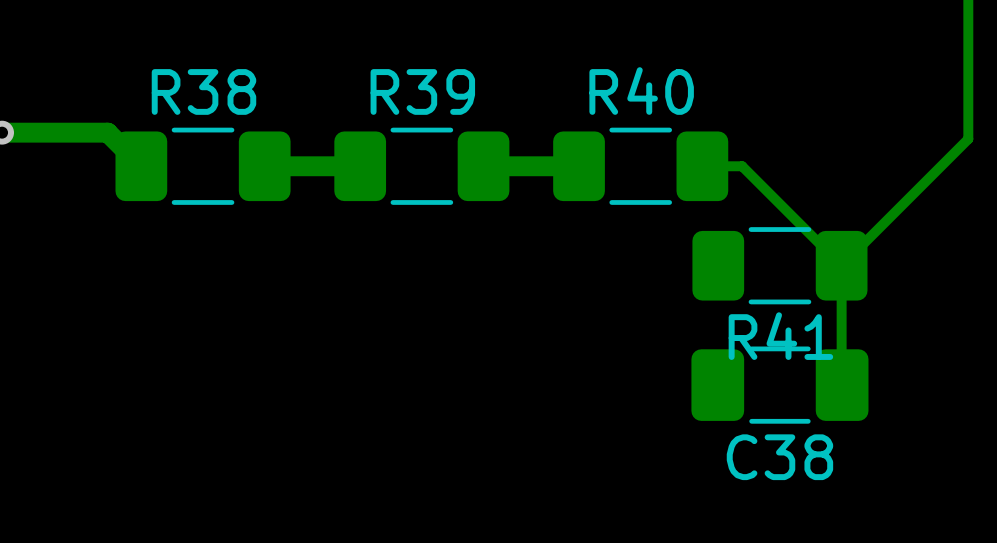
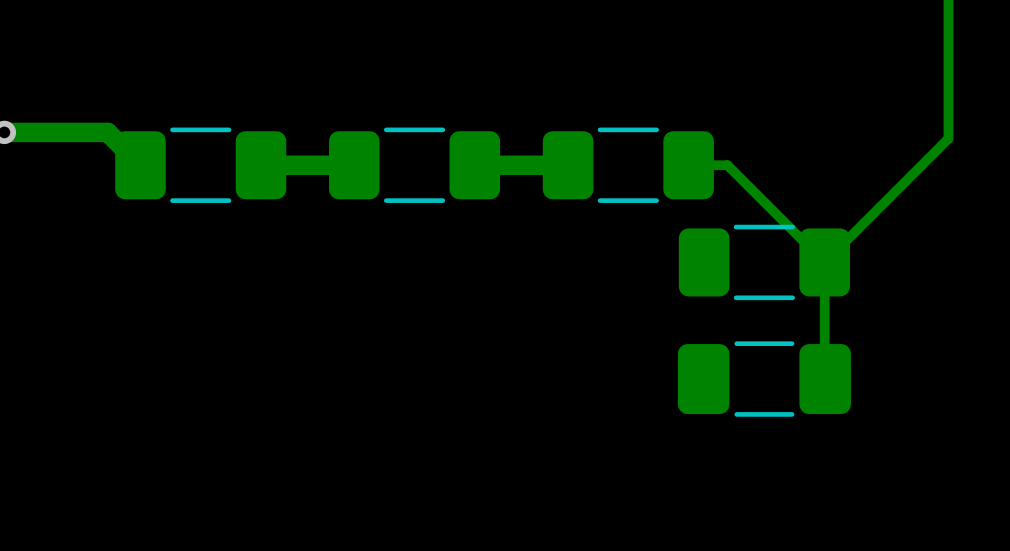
R38 name: R38 (203, 91) -> none
R39 name: R39 (422, 91) -> none
R40 name: R40 (641, 91) -> none
R41 name: R41 (780, 336) -> none
C38 name: C38 (779, 457) -> none

